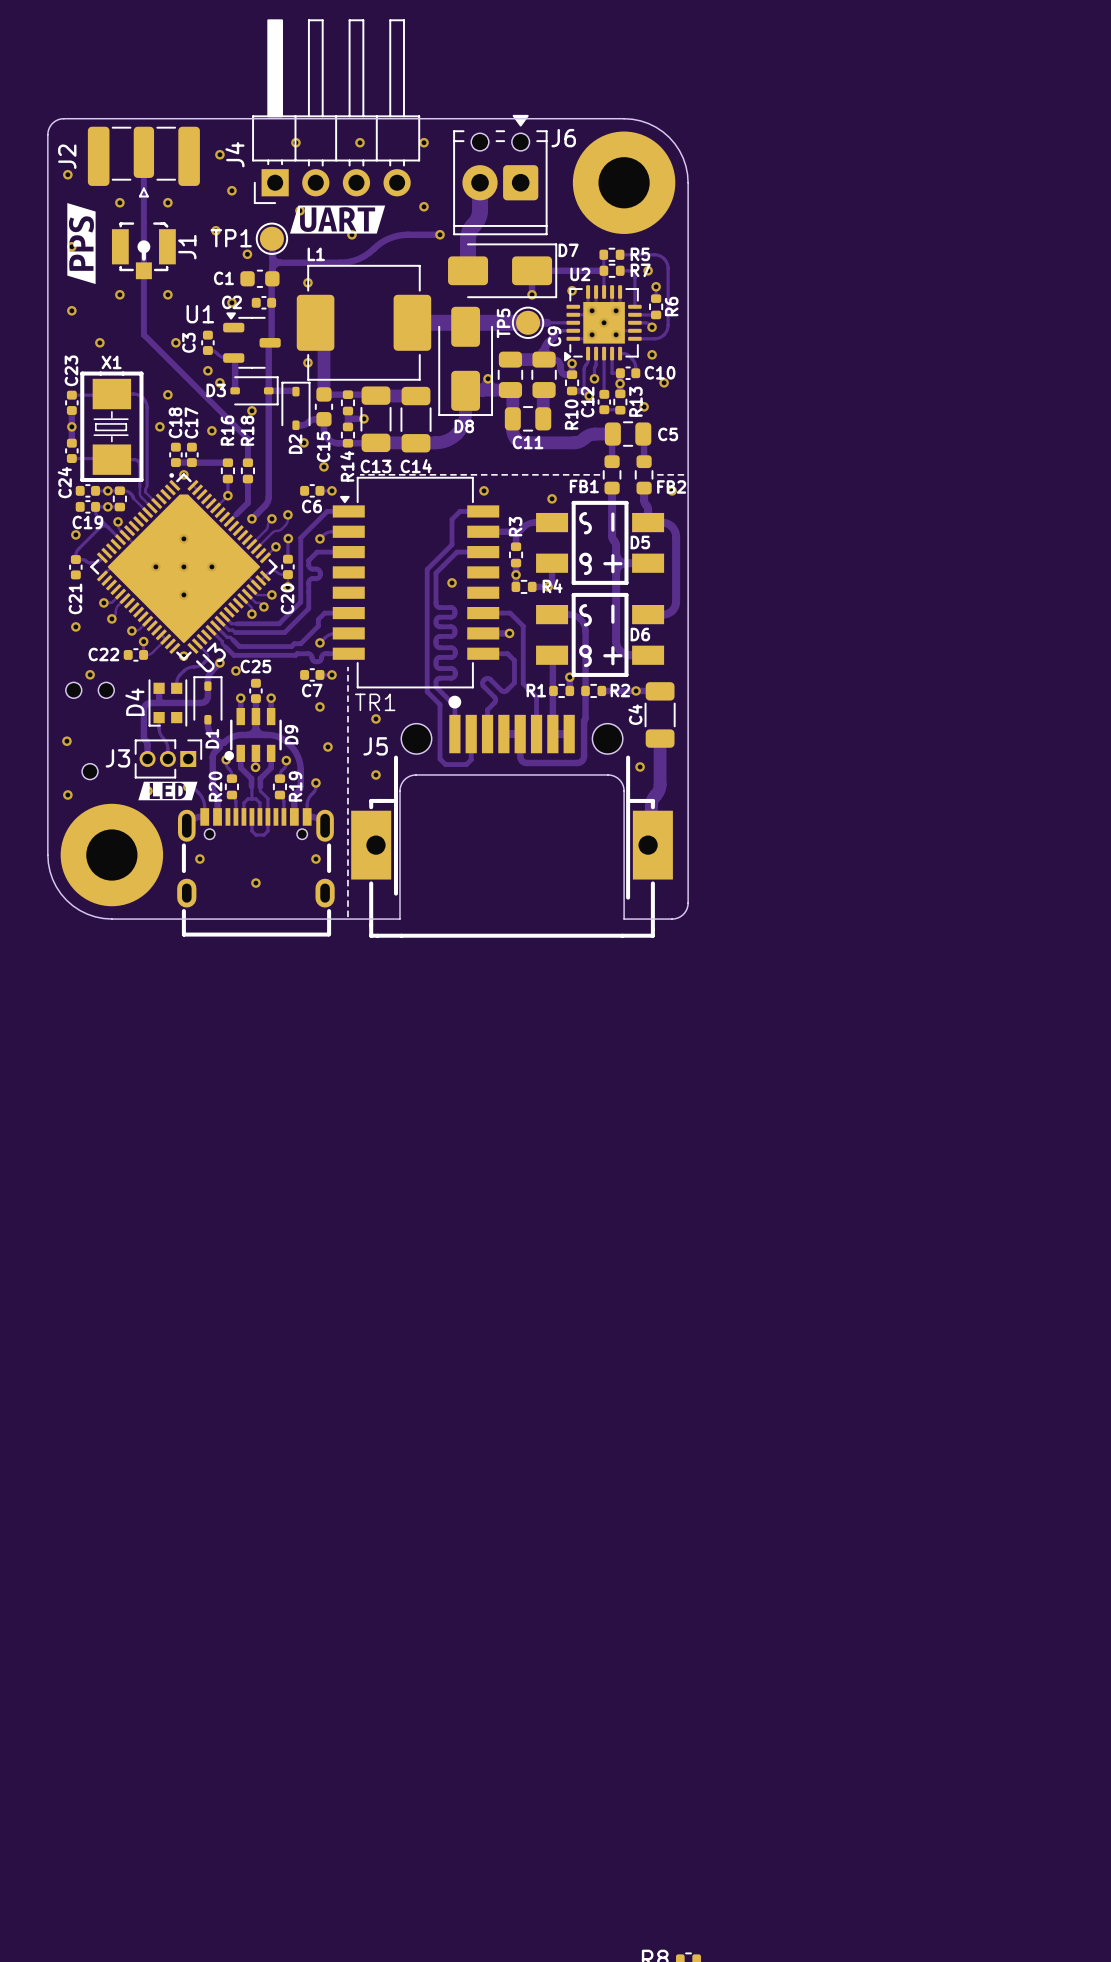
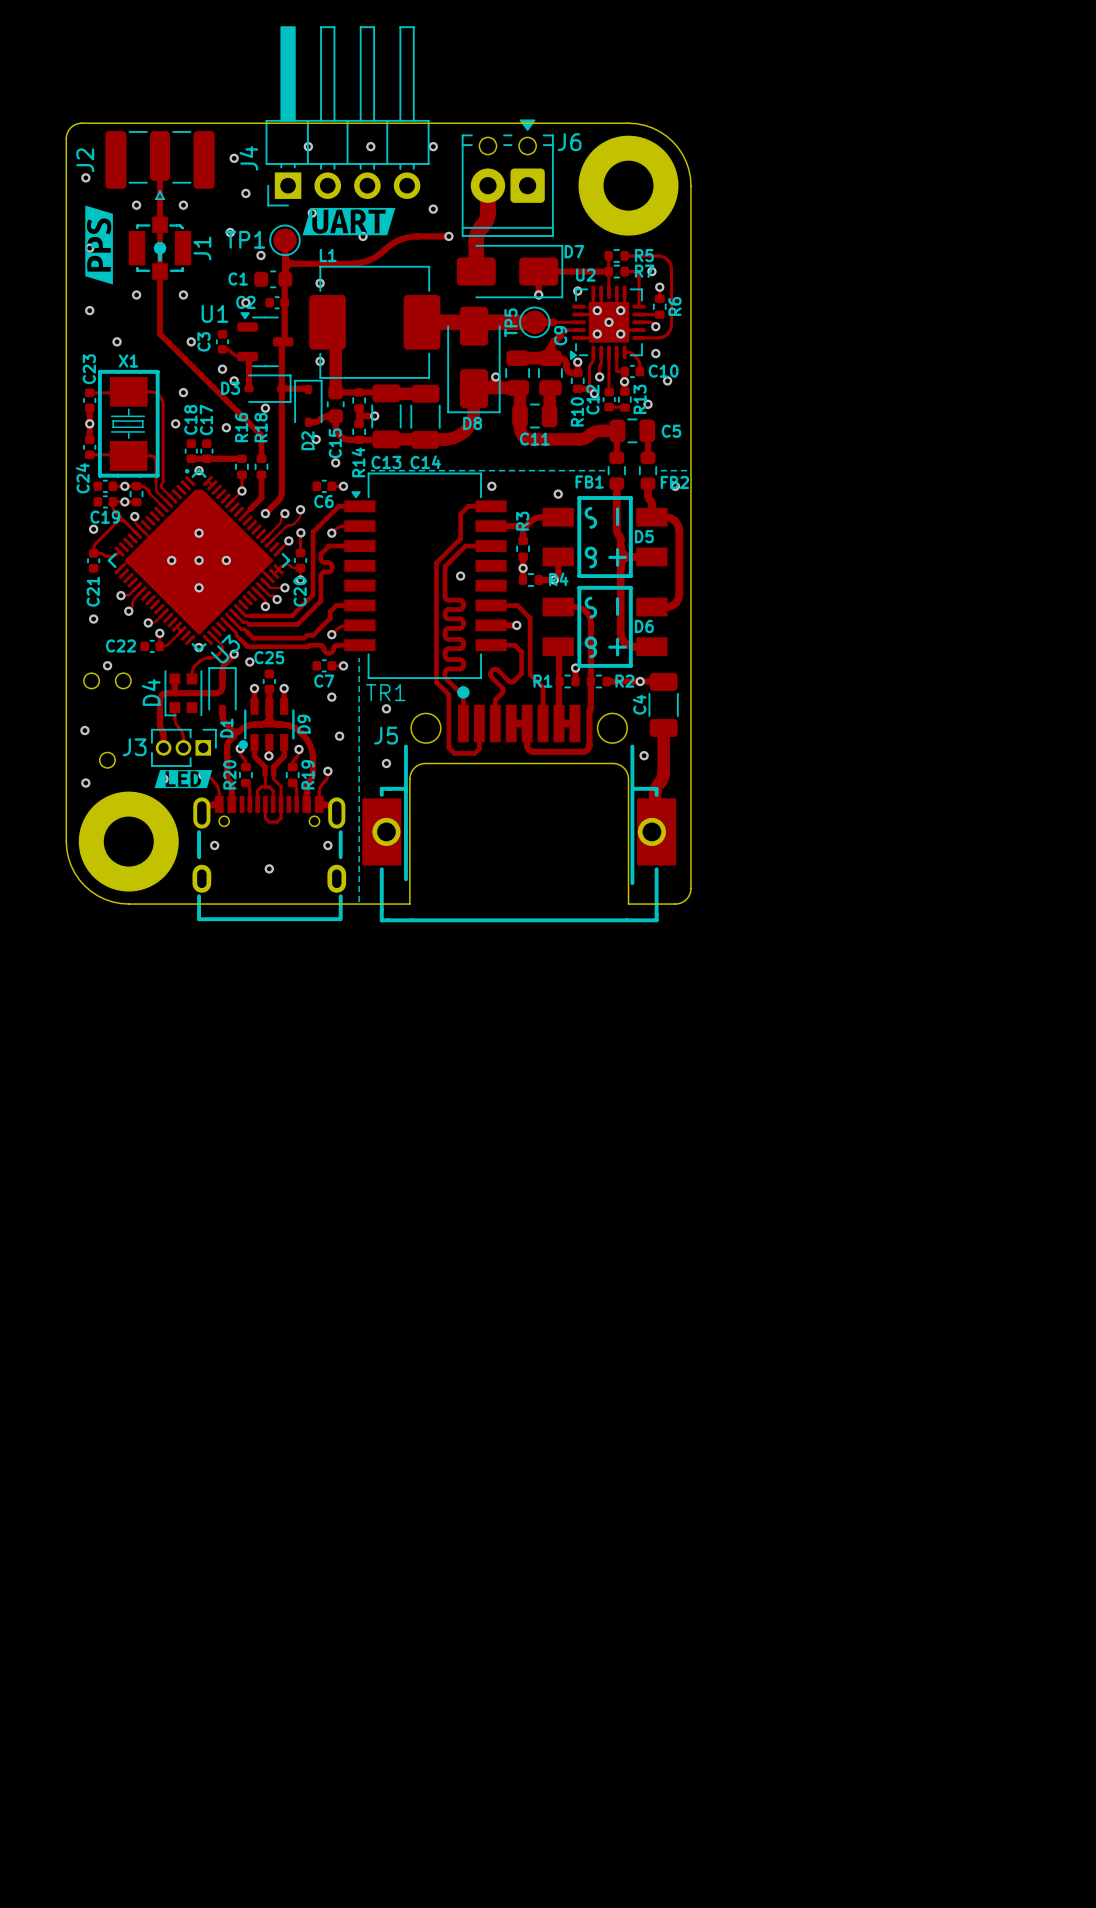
J1 footprint: [111, 222, 176, 280] -> [128, 216, 192, 280]

